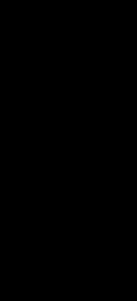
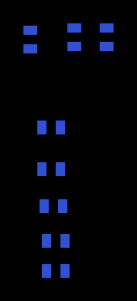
part: none -> (74, 37)
part: none -> (106, 37)
part: none -> (30, 39)
part: none -> (51, 127)
part: none -> (51, 169)
part: none -> (53, 206)
part: none -> (55, 240)
part: none -> (55, 270)

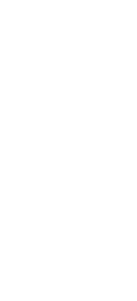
part: (74, 37) -> none
part: (106, 37) -> none
part: (30, 39) -> none
part: (51, 127) -> none
part: (51, 169) -> none
part: (53, 206) -> none
part: (55, 240) -> none
part: (55, 270) -> none

